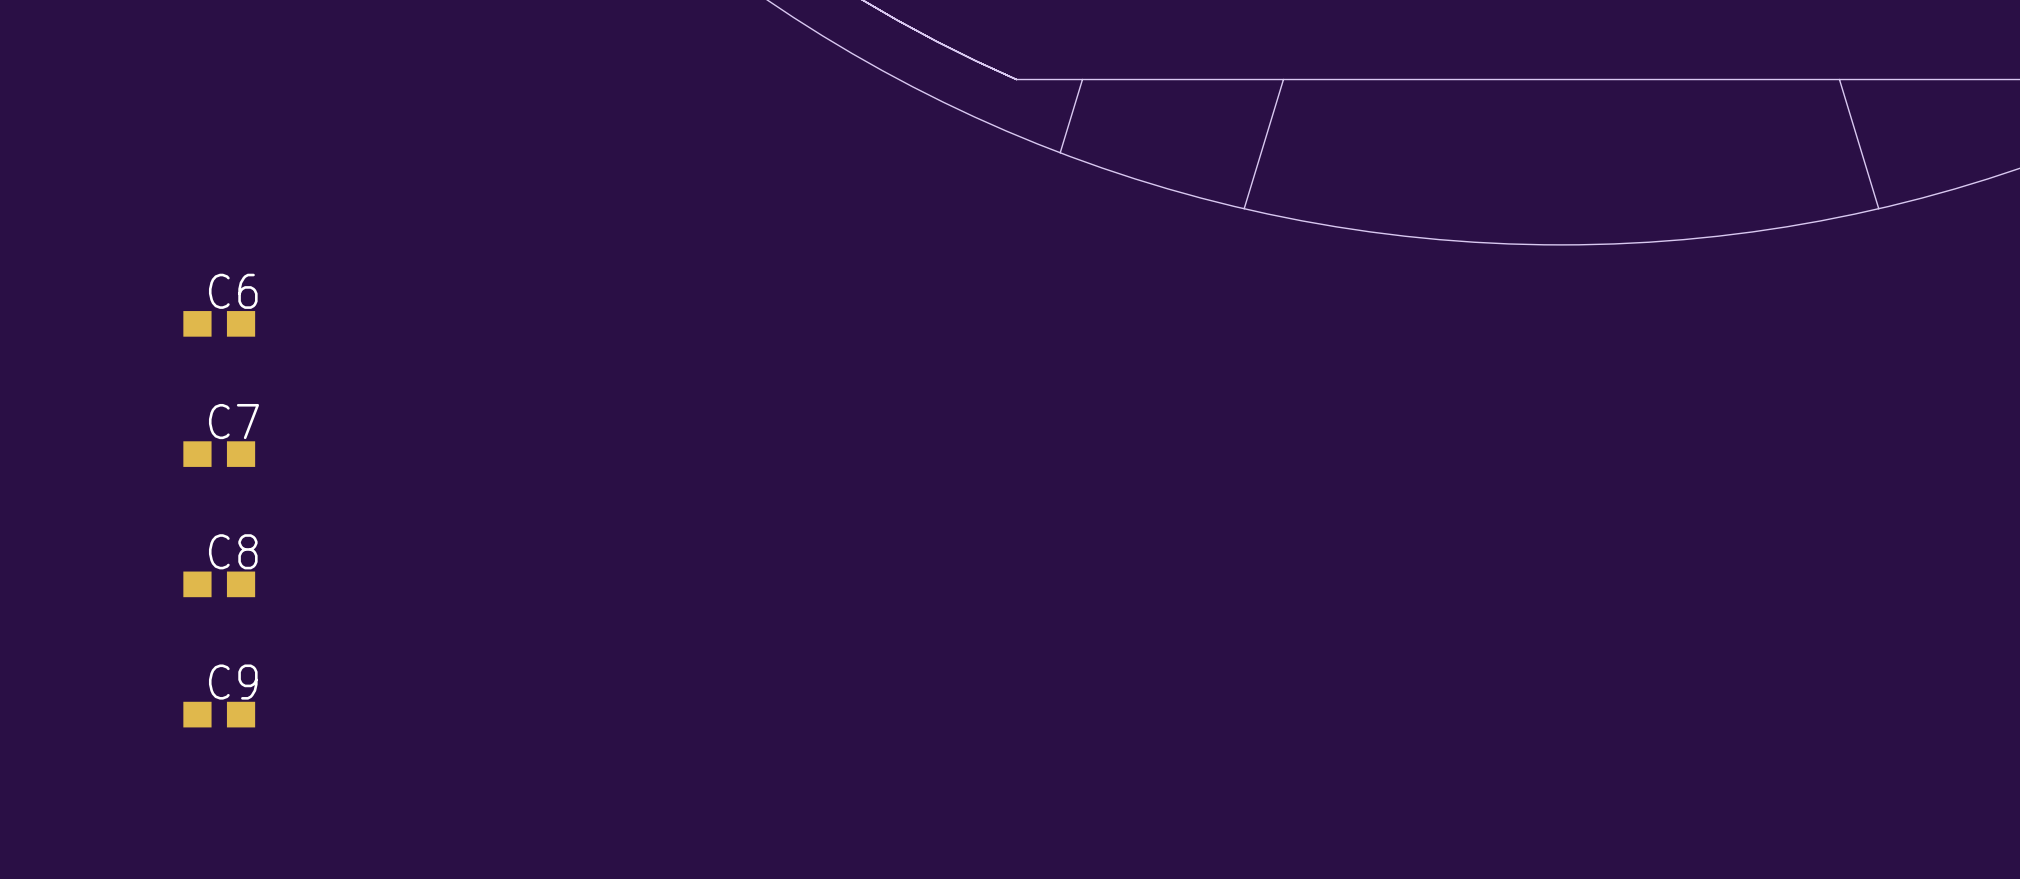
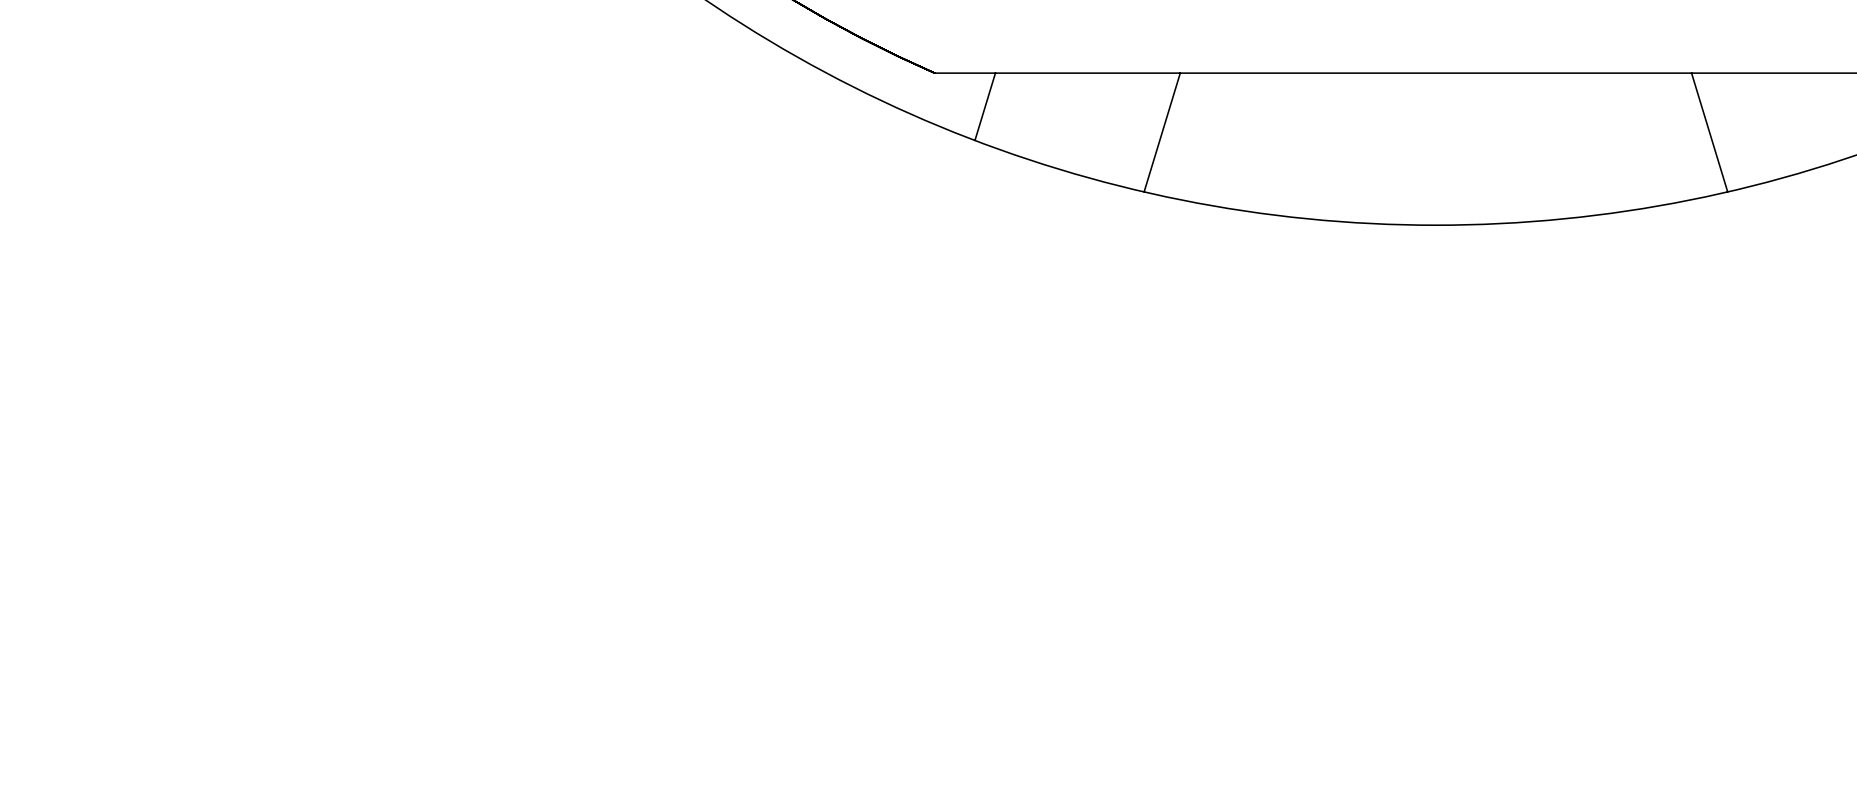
C6: (219, 323) -> none
C7: (219, 454) -> none
C8: (219, 584) -> none
C9: (219, 714) -> none

